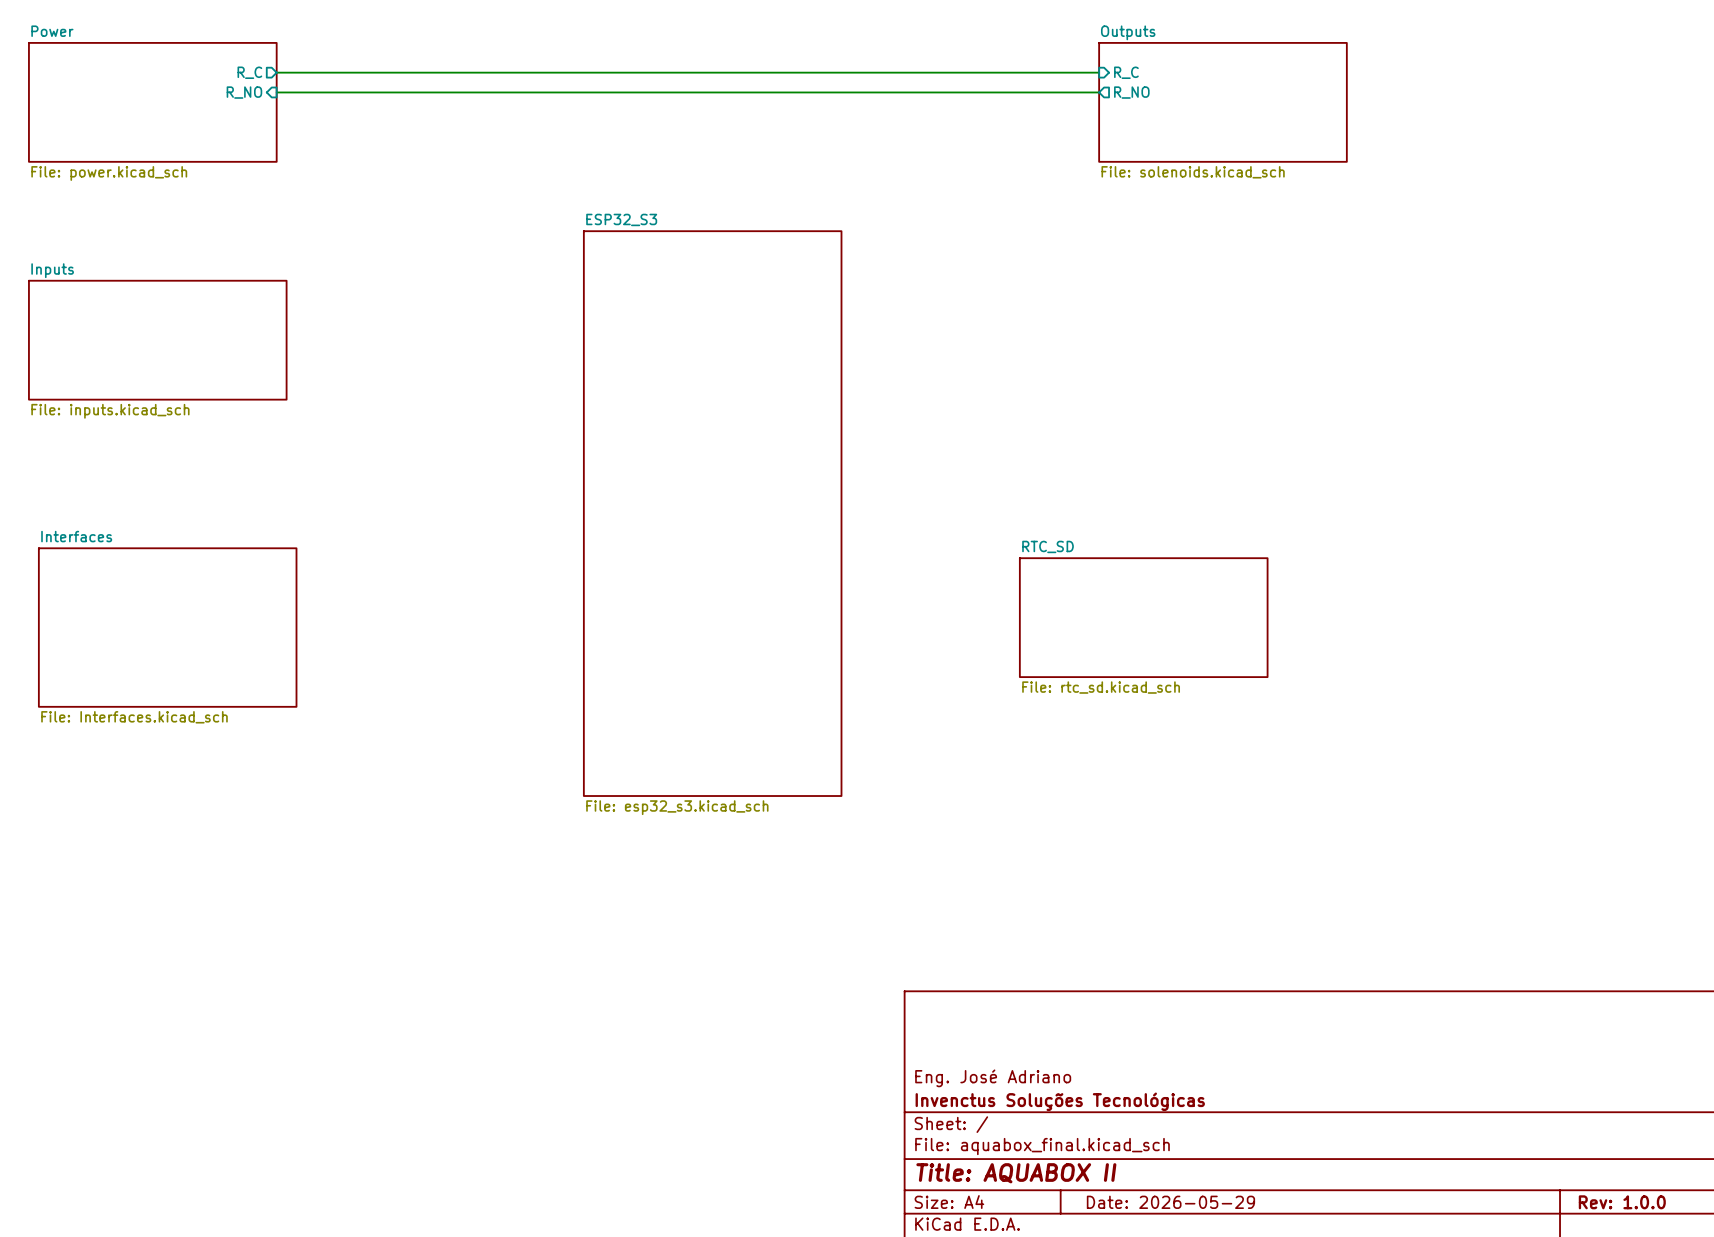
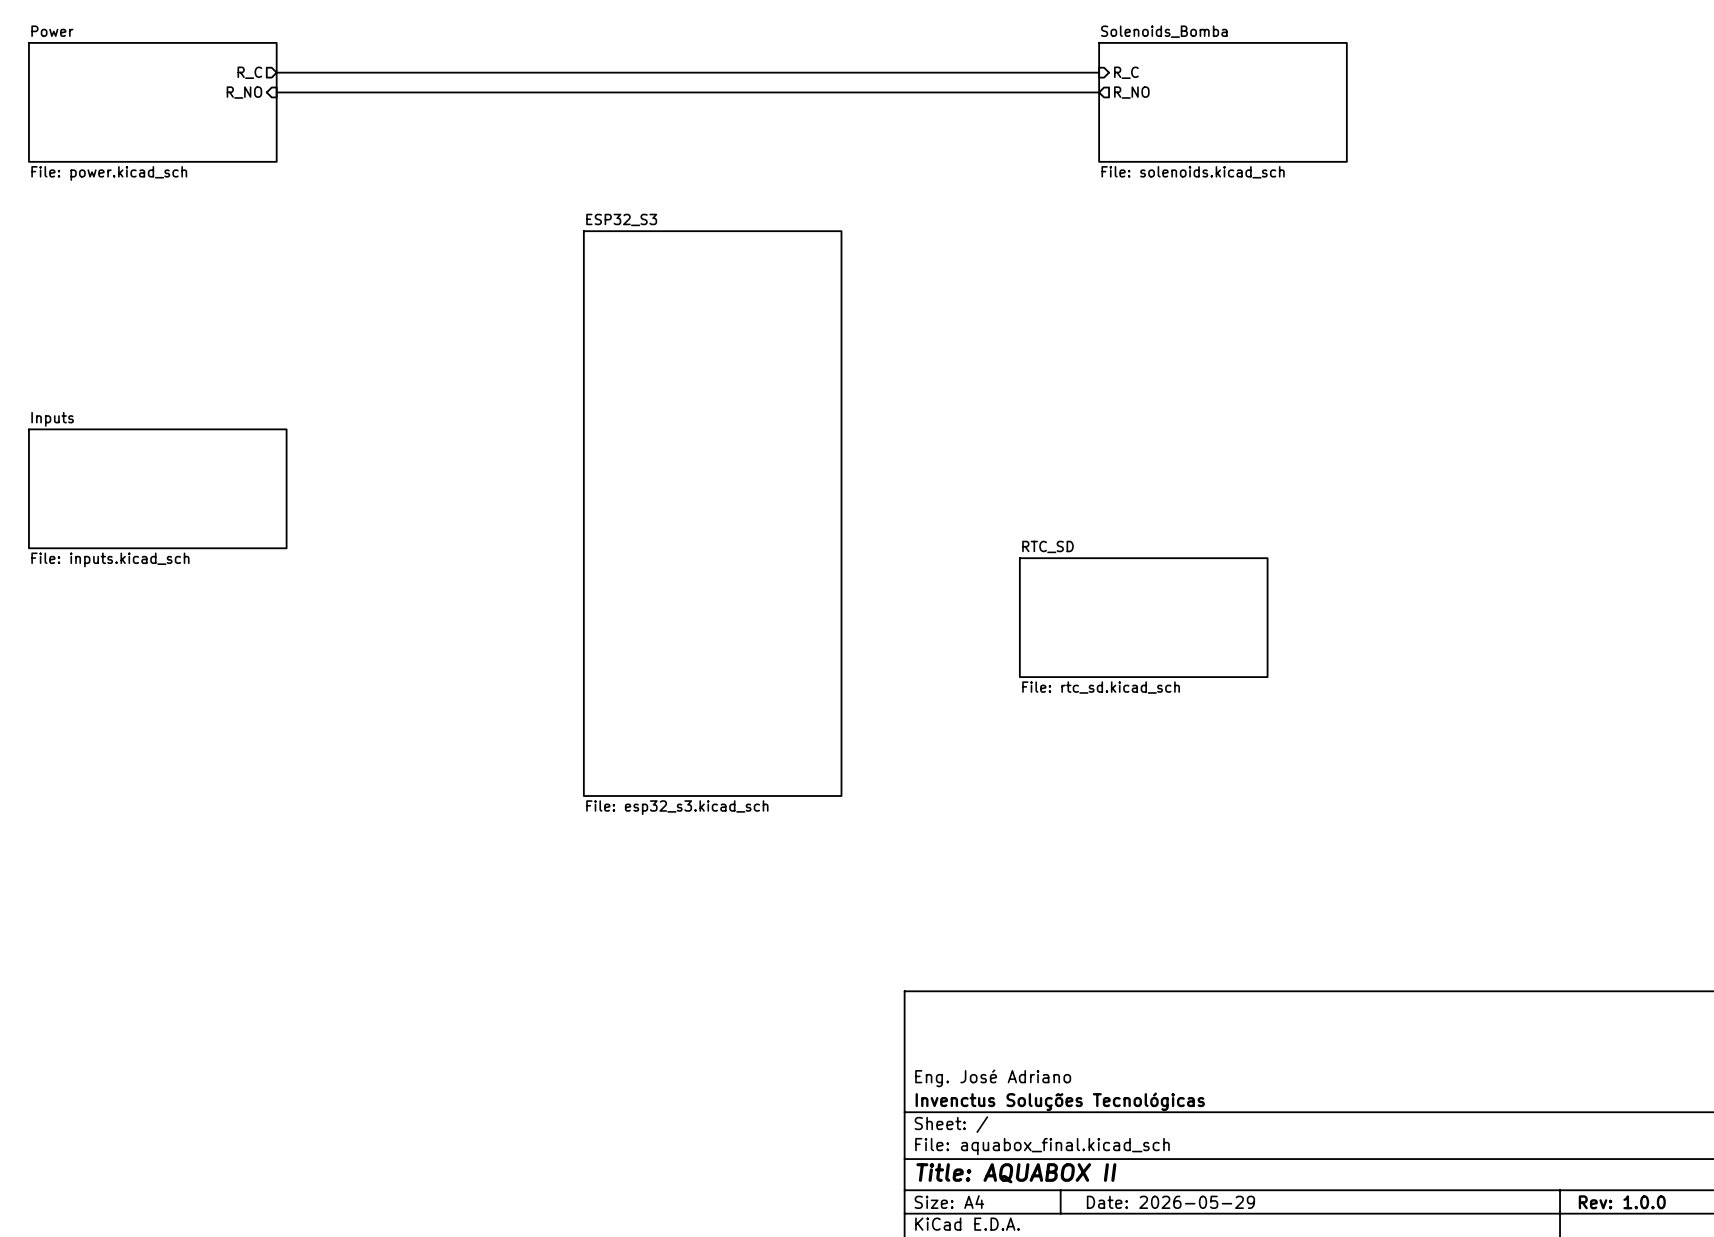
sheet Outputs name: Outputs (1128, 32) -> Solenoids_Bomba (1164, 31)
sheet Inputs position: (157, 340) -> (157, 488)
sheet Interfaces: File: Interfaces.kicad_sch (167, 627) -> none

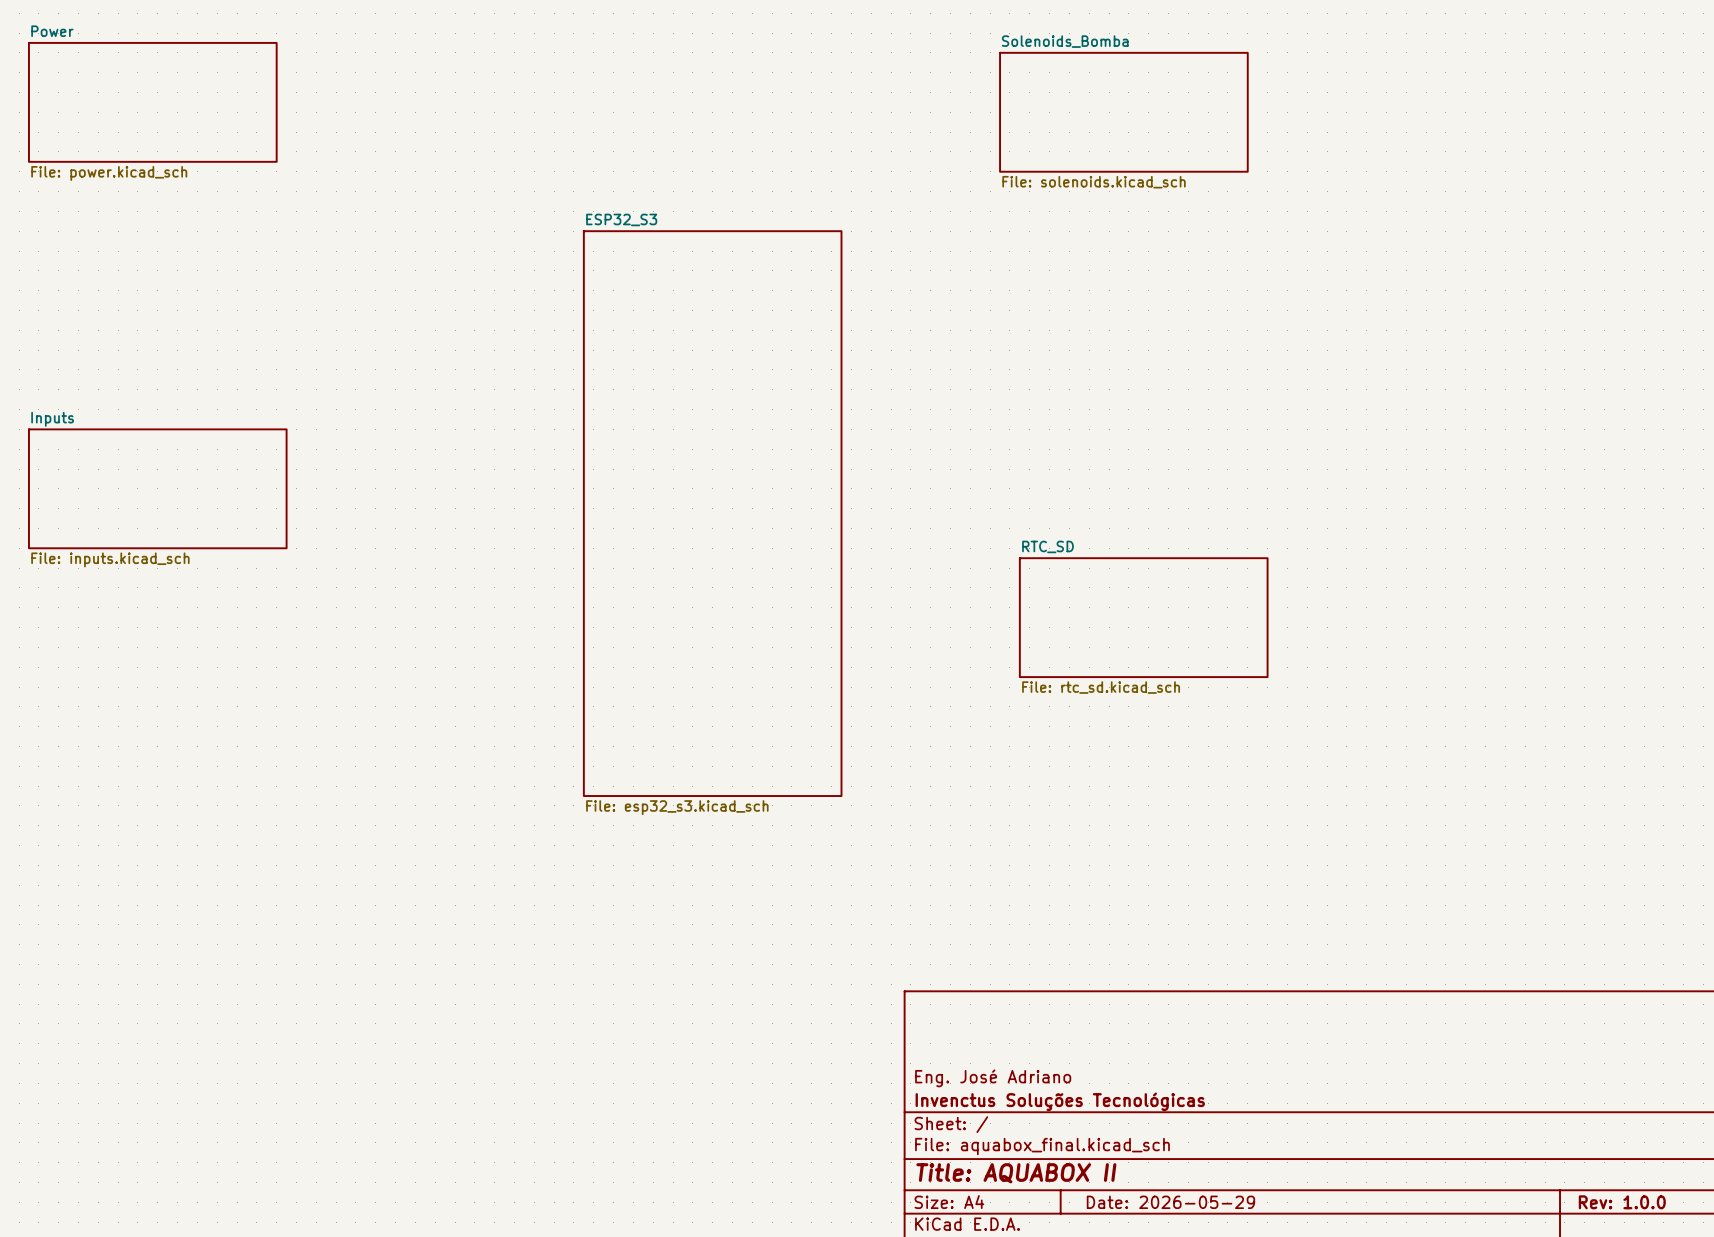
sheet pin: R_C (249, 72) -> none
wire: (276, 72) (1099, 72) -> none
sheet pin: R_C (1126, 72) -> none
sheet pin: R_NO (244, 92) -> none
wire: (276, 92) (1099, 92) -> none
sheet pin: R_NO (1131, 92) -> none
sheet Solenoids_Bomba position: (1222, 102) -> (1123, 112)

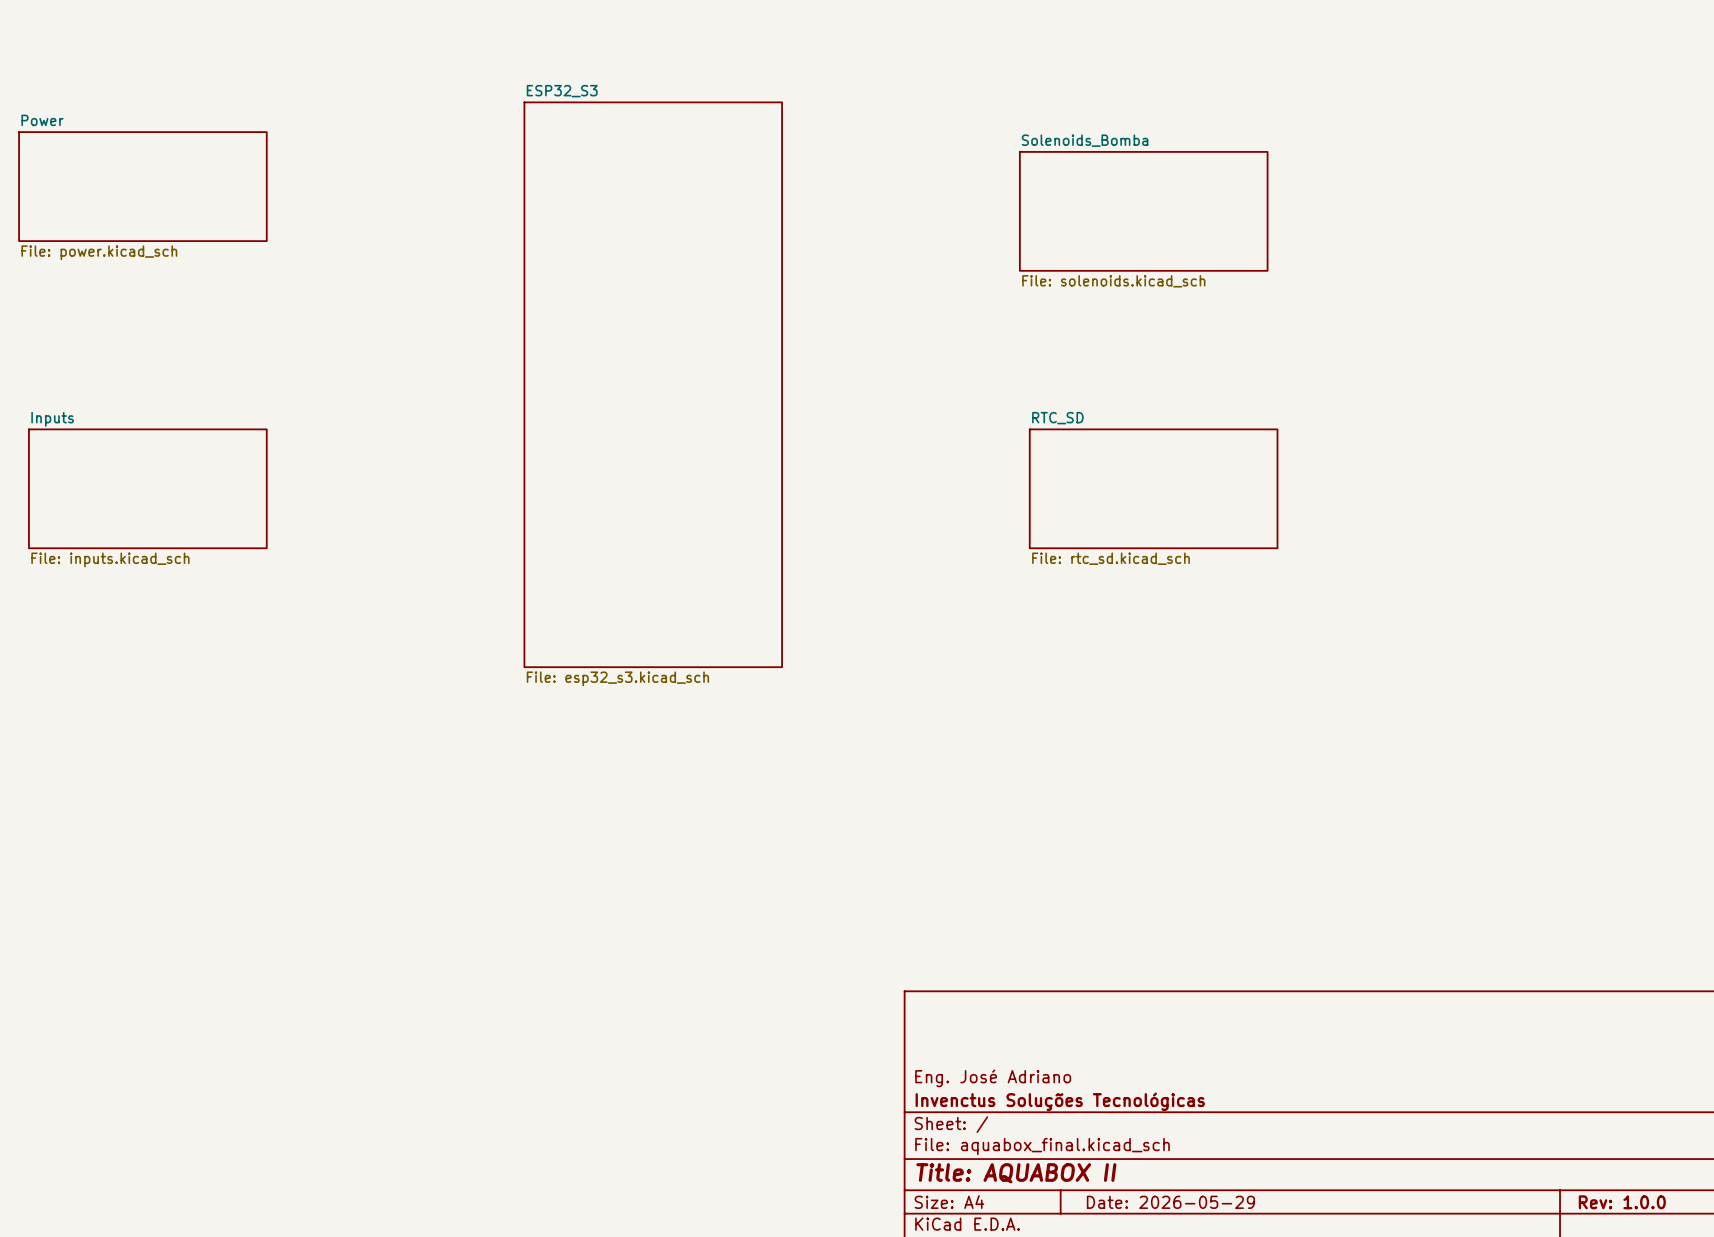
sheet Power: File: power.kicad_sch (152, 102) -> none
sheet Solenoids_Bomba position: (1123, 112) -> (1143, 211)
sheet Power: none -> File: power.kicad_sch (142, 186)
sheet Inputs: none -> File: inputs.kicad_sch (147, 488)
sheet Inputs: File: inputs.kicad_sch (157, 488) -> none
sheet ESP32_S3 position: (712, 513) -> (653, 384)
sheet RTC_SD position: (1143, 617) -> (1153, 488)

